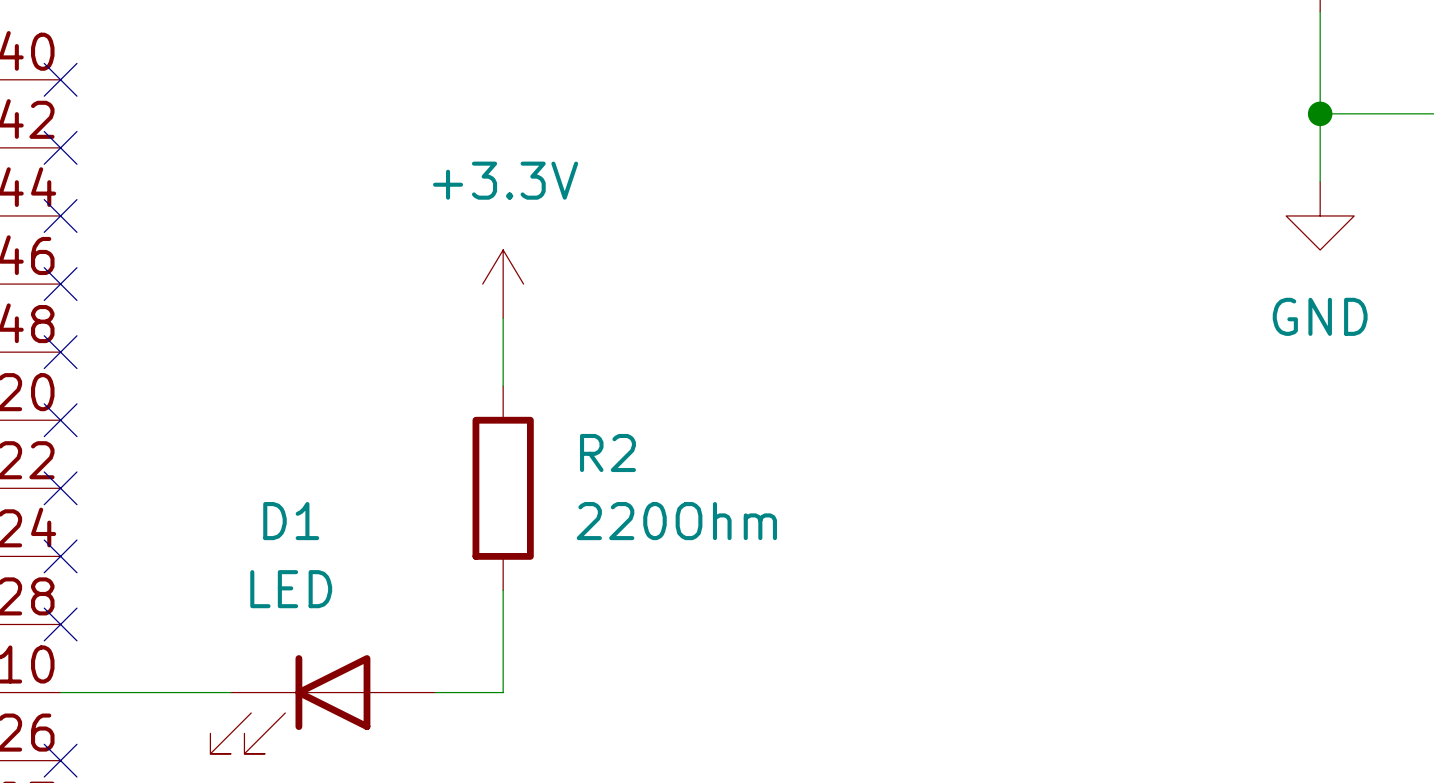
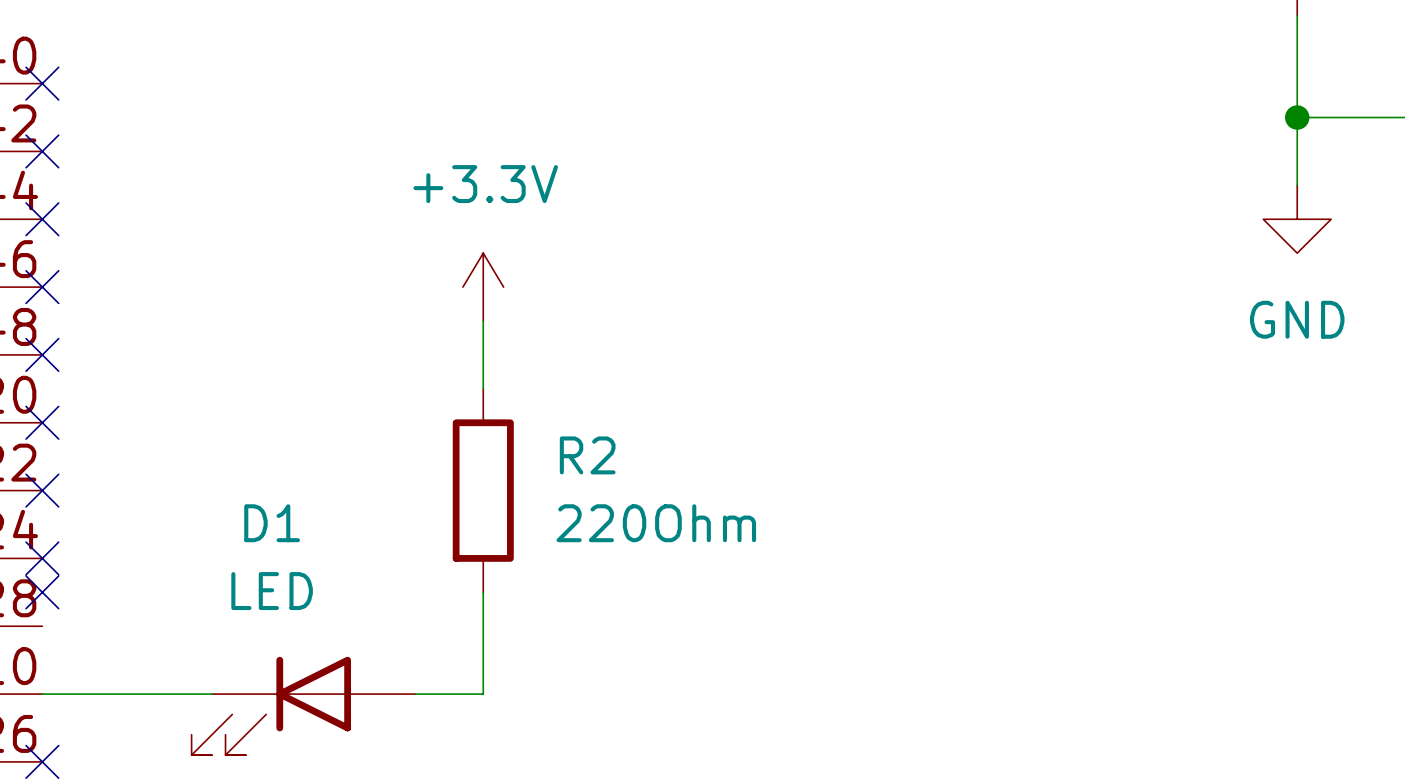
no-connect mark position: (60, 624) -> (42, 592)

